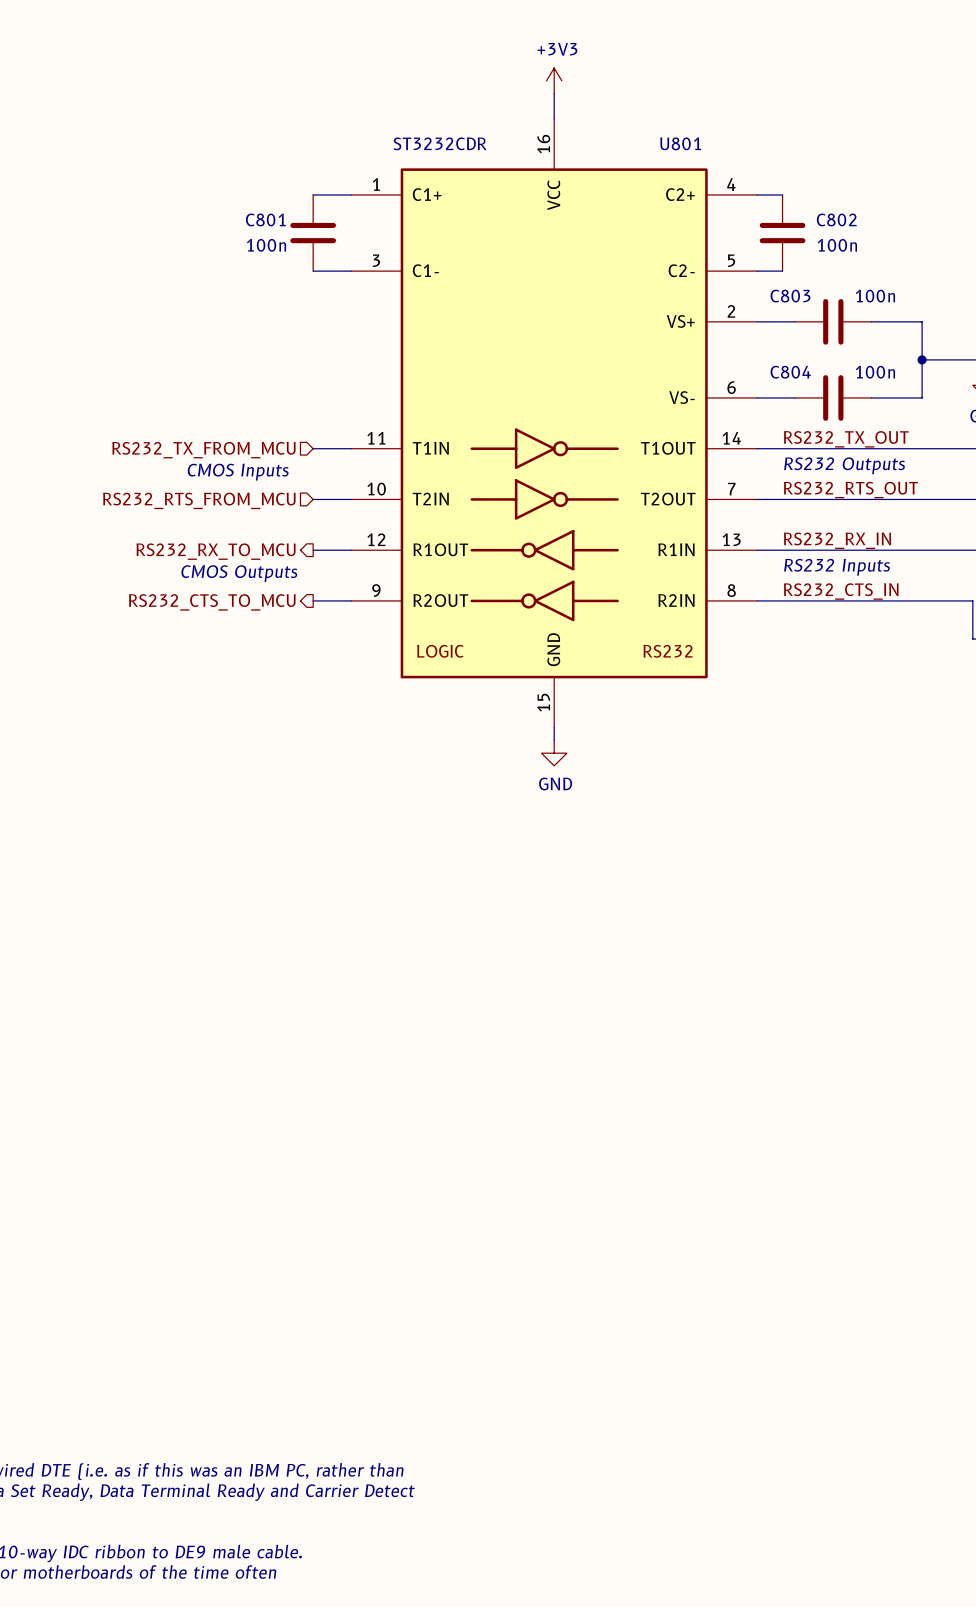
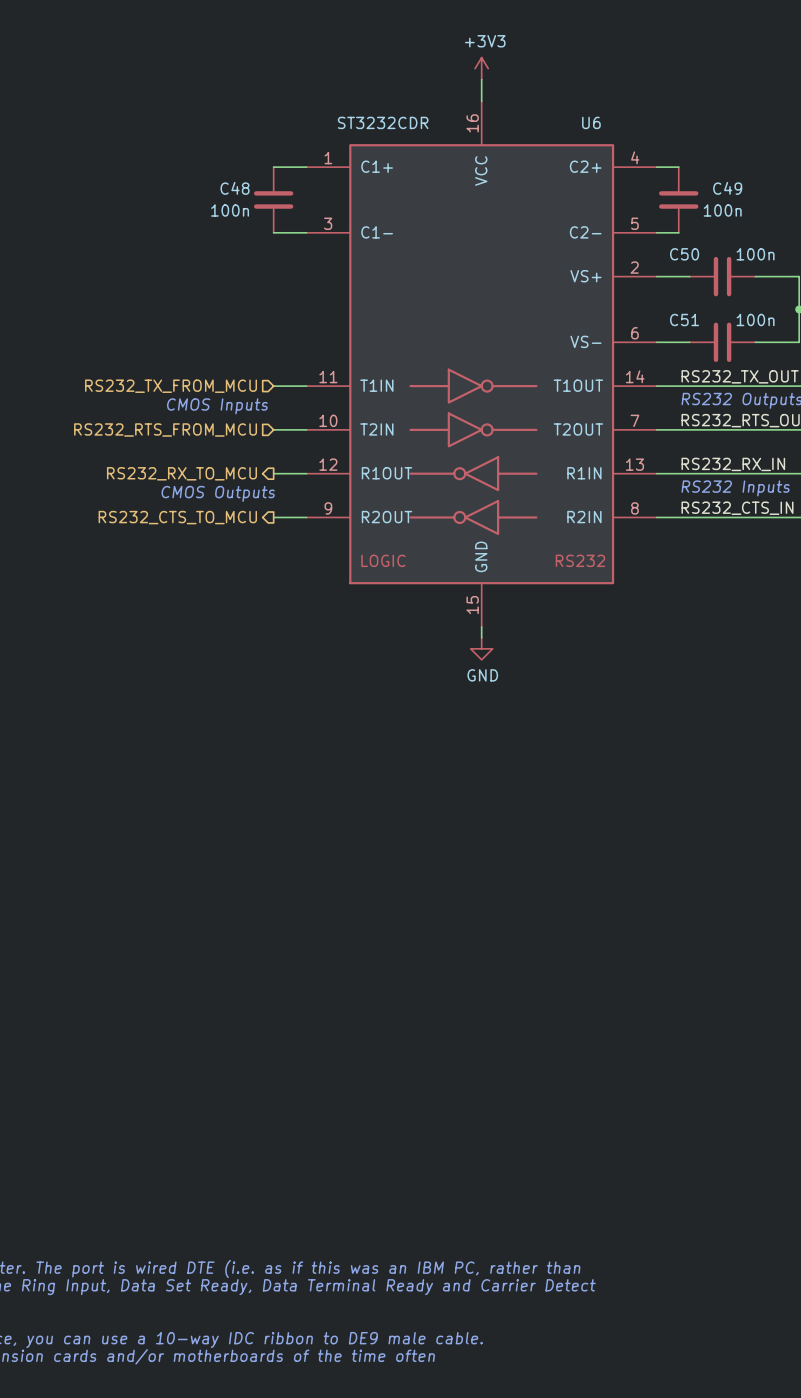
U801 name: U801 (680, 143) -> U6 (591, 122)
C801 name: C801 (265, 219) -> C48 (234, 188)
C802 name: C802 (836, 219) -> C49 (727, 188)
C803 name: C803 (790, 296) -> C50 (684, 254)
C804 name: C804 (790, 372) -> C51 (684, 319)

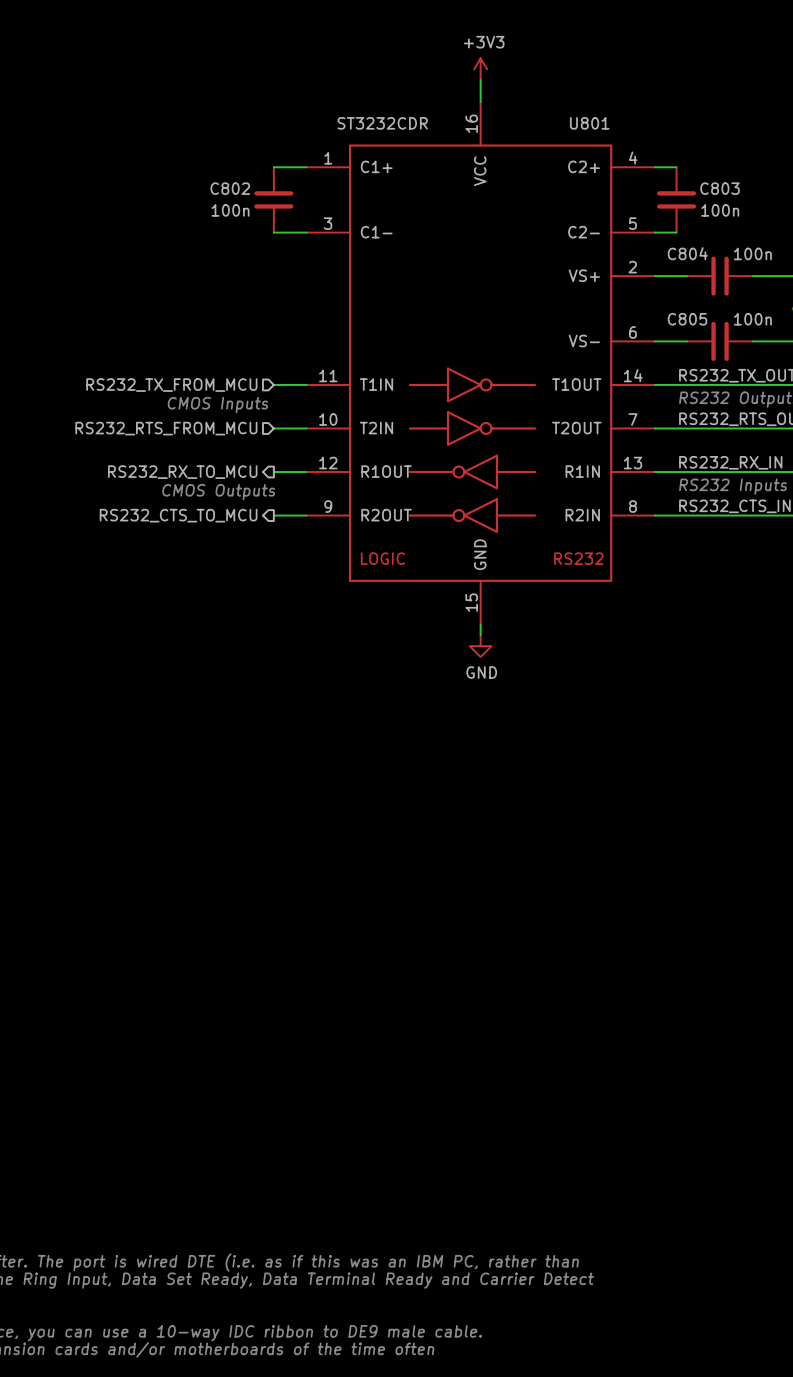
U6 name: U6 (591, 122) -> U801 (589, 123)
C48 name: C48 (234, 188) -> C802 (230, 188)
C49 name: C49 (727, 188) -> C803 (719, 188)
C50 name: C50 (684, 254) -> C804 (687, 253)
C51 name: C51 (684, 319) -> C805 (687, 319)

